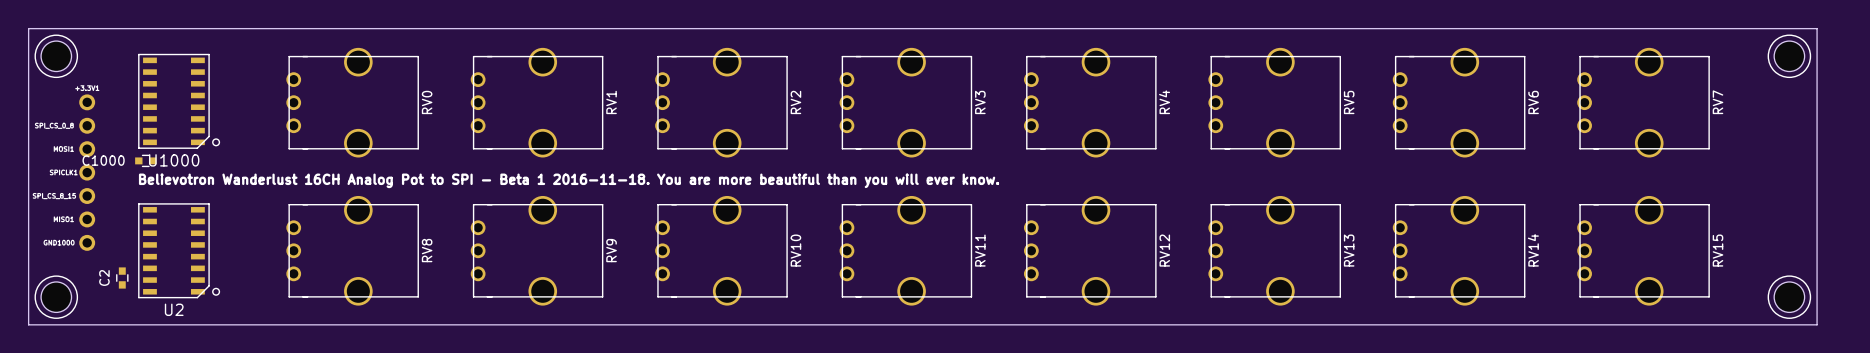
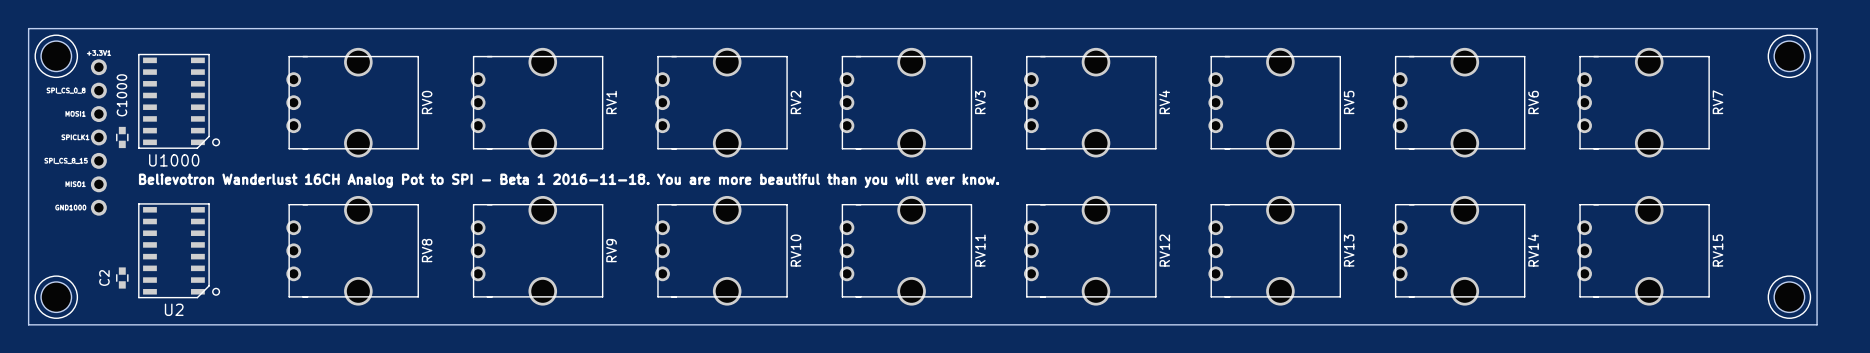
part position: (87, 102) -> (98, 67)
part position: (87, 125) -> (98, 90)
part position: (87, 149) -> (98, 114)
C1000 rotation: 0° (145, 160) -> 90° clockwise (122, 137)
C1000 position: (145, 160) -> (122, 137)
part position: (87, 172) -> (98, 137)
part position: (87, 196) -> (98, 160)
part position: (87, 219) -> (98, 184)
part position: (87, 242) -> (98, 207)

